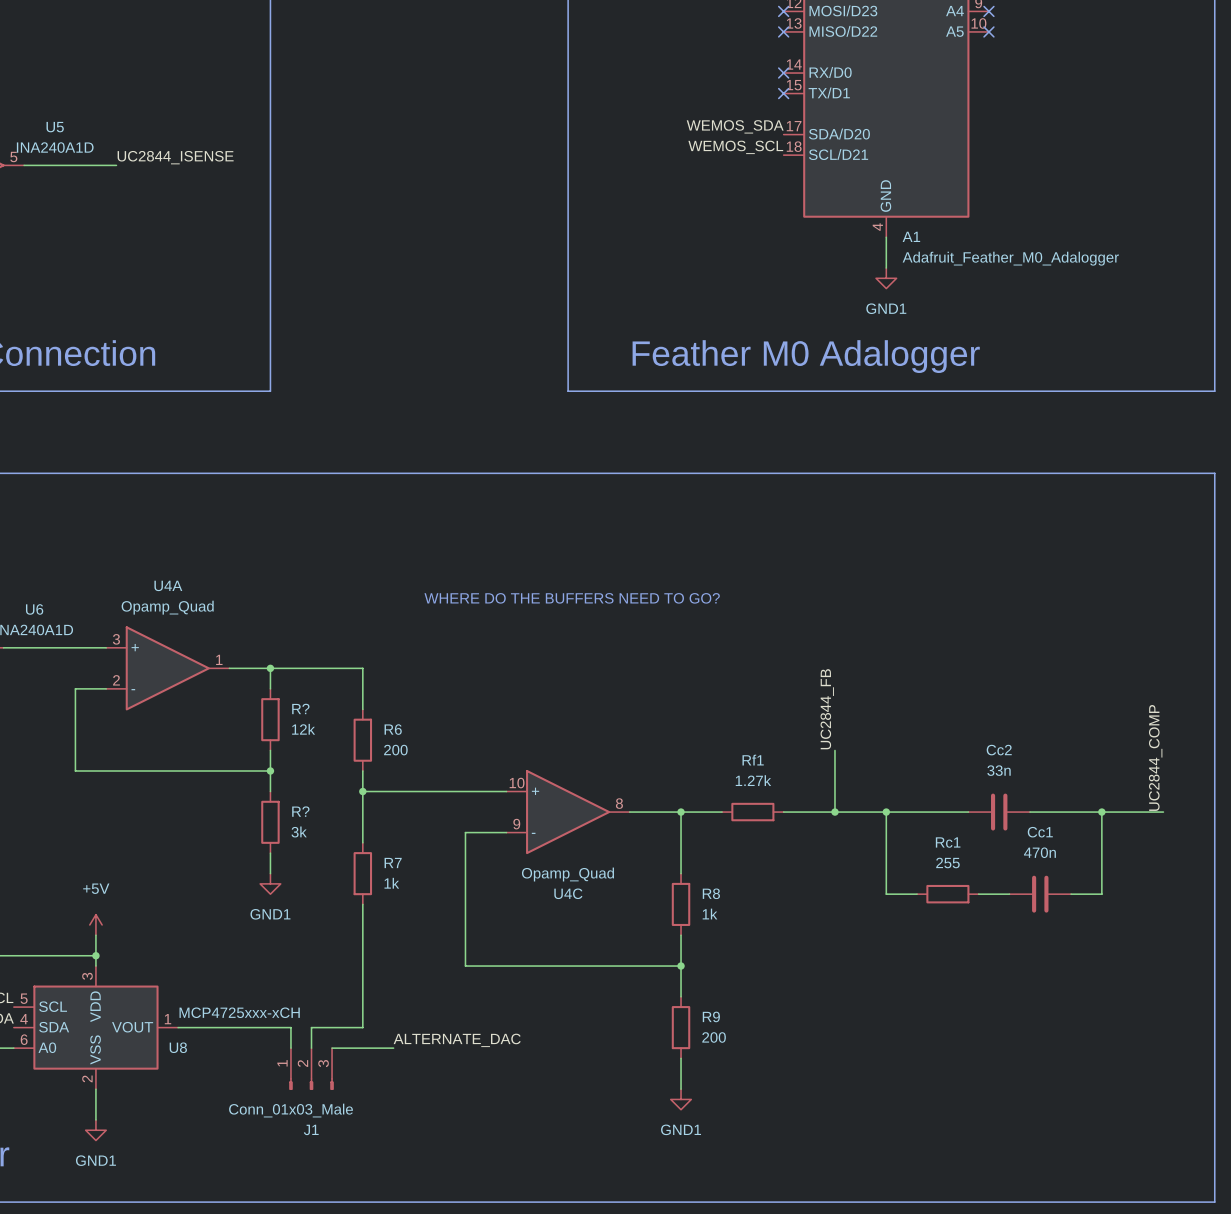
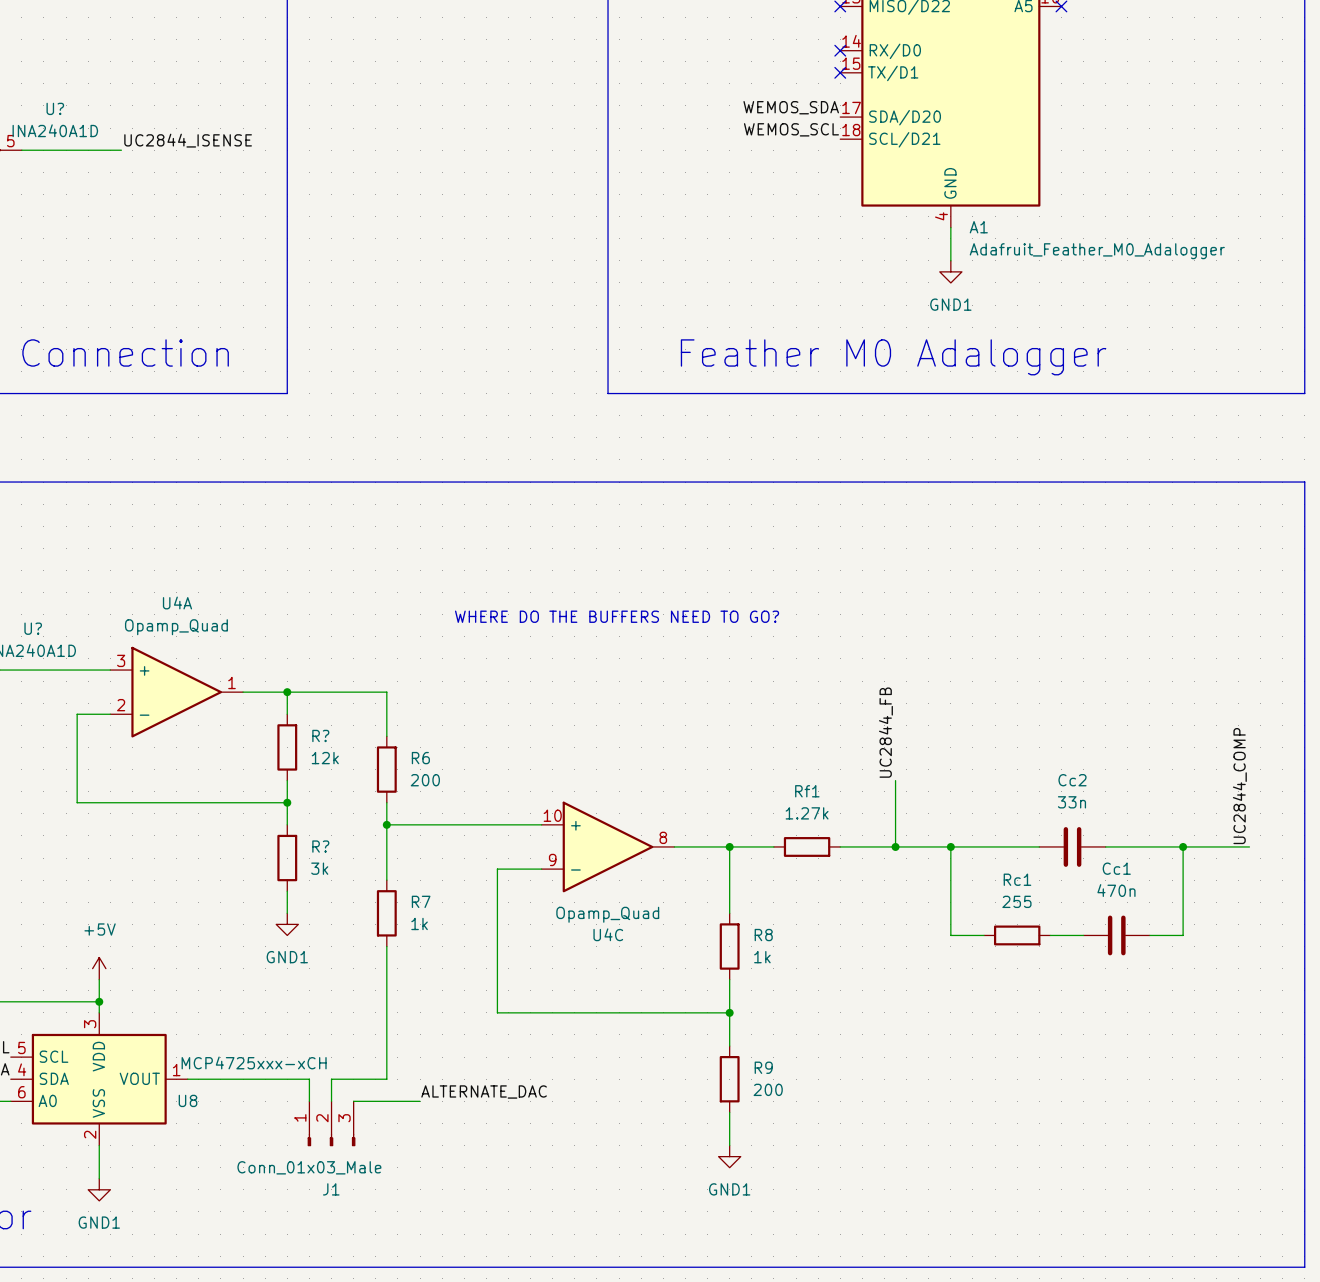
U5 name: U5 (55, 127) -> U? (55, 108)
U6 name: U6 (34, 609) -> U? (33, 628)

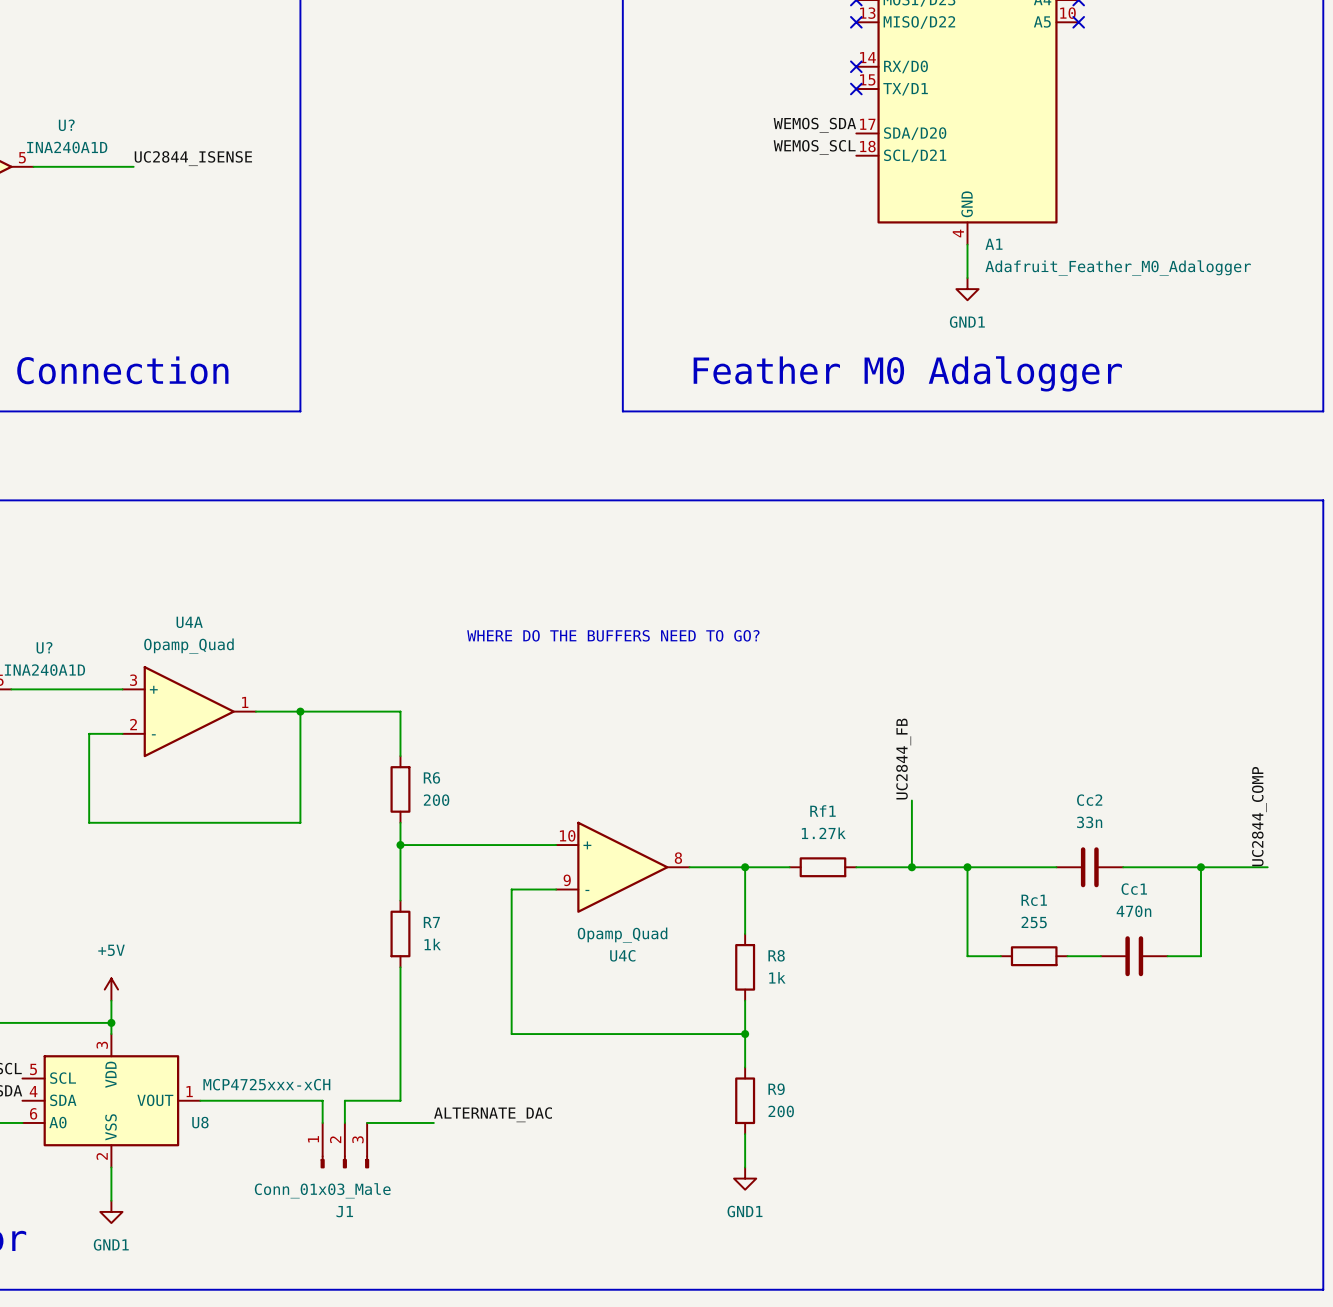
wire: none -> (300, 733) (300, 800)
R?: 12k (287, 747) -> none
wire: (287, 802) (287, 824) -> none
junction: (287, 802) -> none
R?: 3k (287, 858) -> none
wire: (287, 891) (287, 913) -> none
power symbol: GND1 (287, 924) -> none

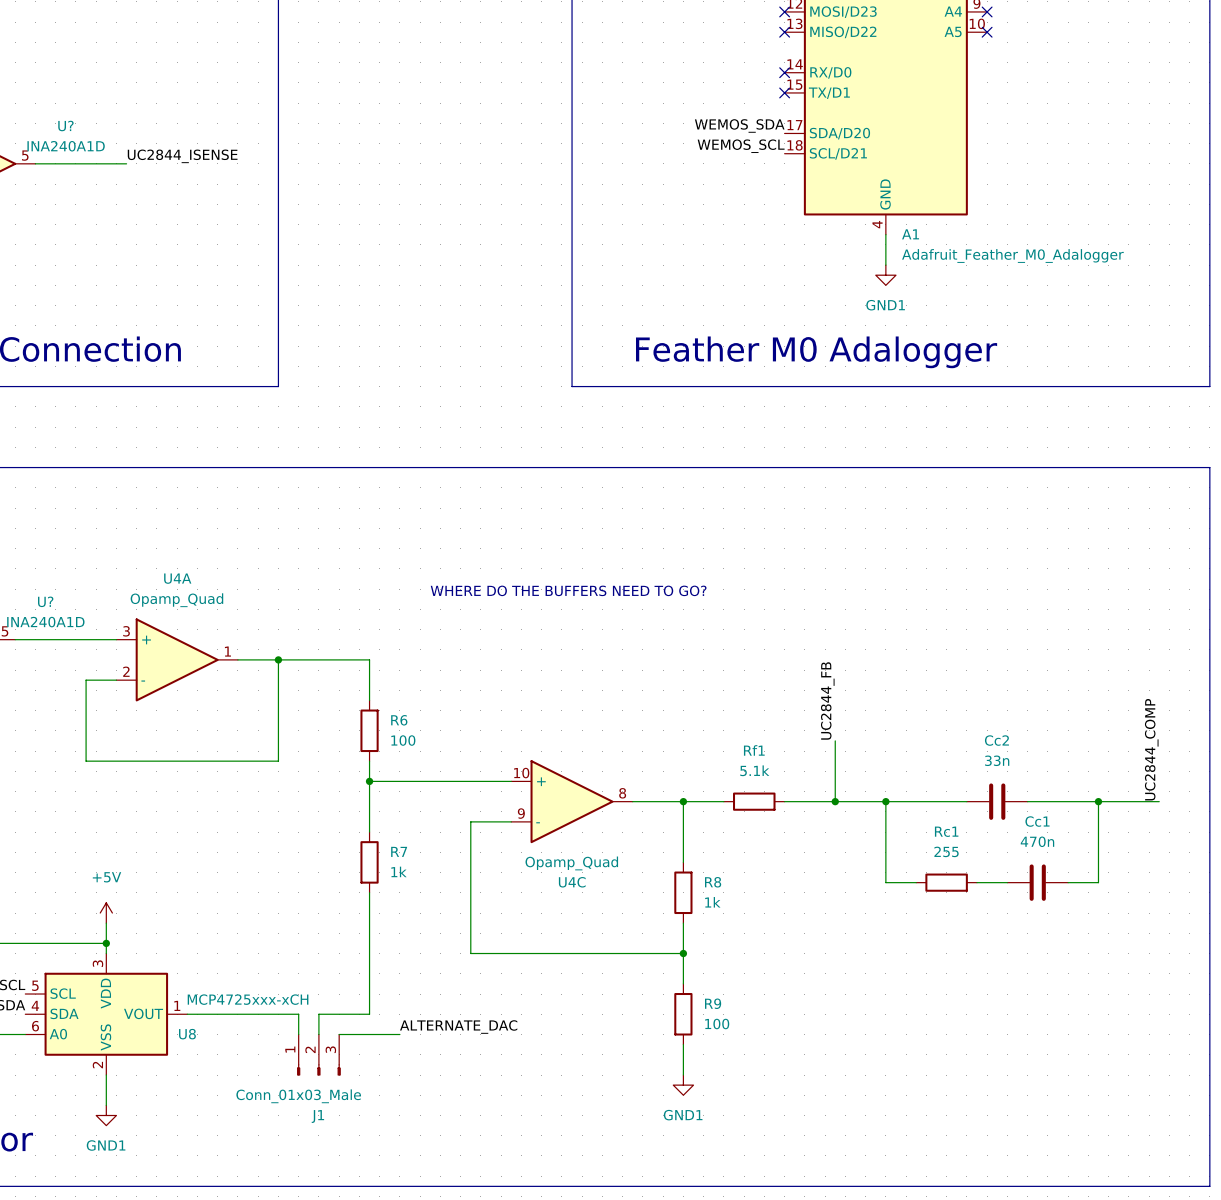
R6 value: 200 (436, 800) -> 100 (403, 740)
Rf1 value: 1.27k (823, 833) -> 5.1k (754, 770)
R9 value: 200 (781, 1111) -> 100 (717, 1024)

